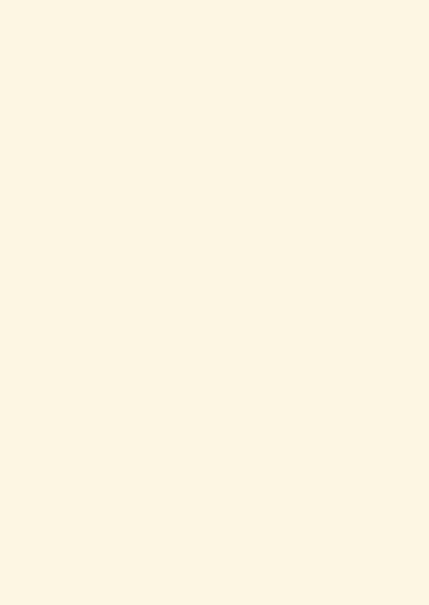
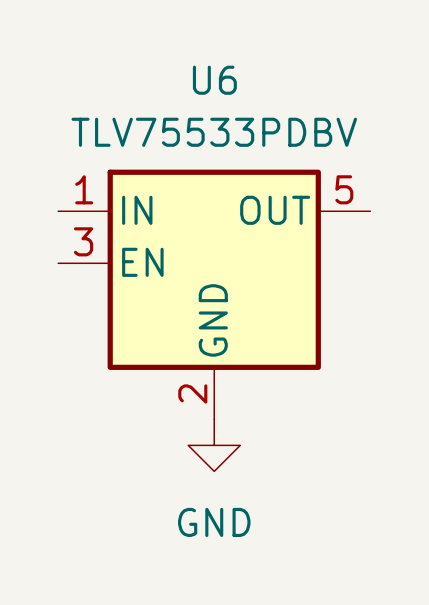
U6: none -> TLV75533PDBV (214, 294)
power symbol: none -> GND (214, 445)

